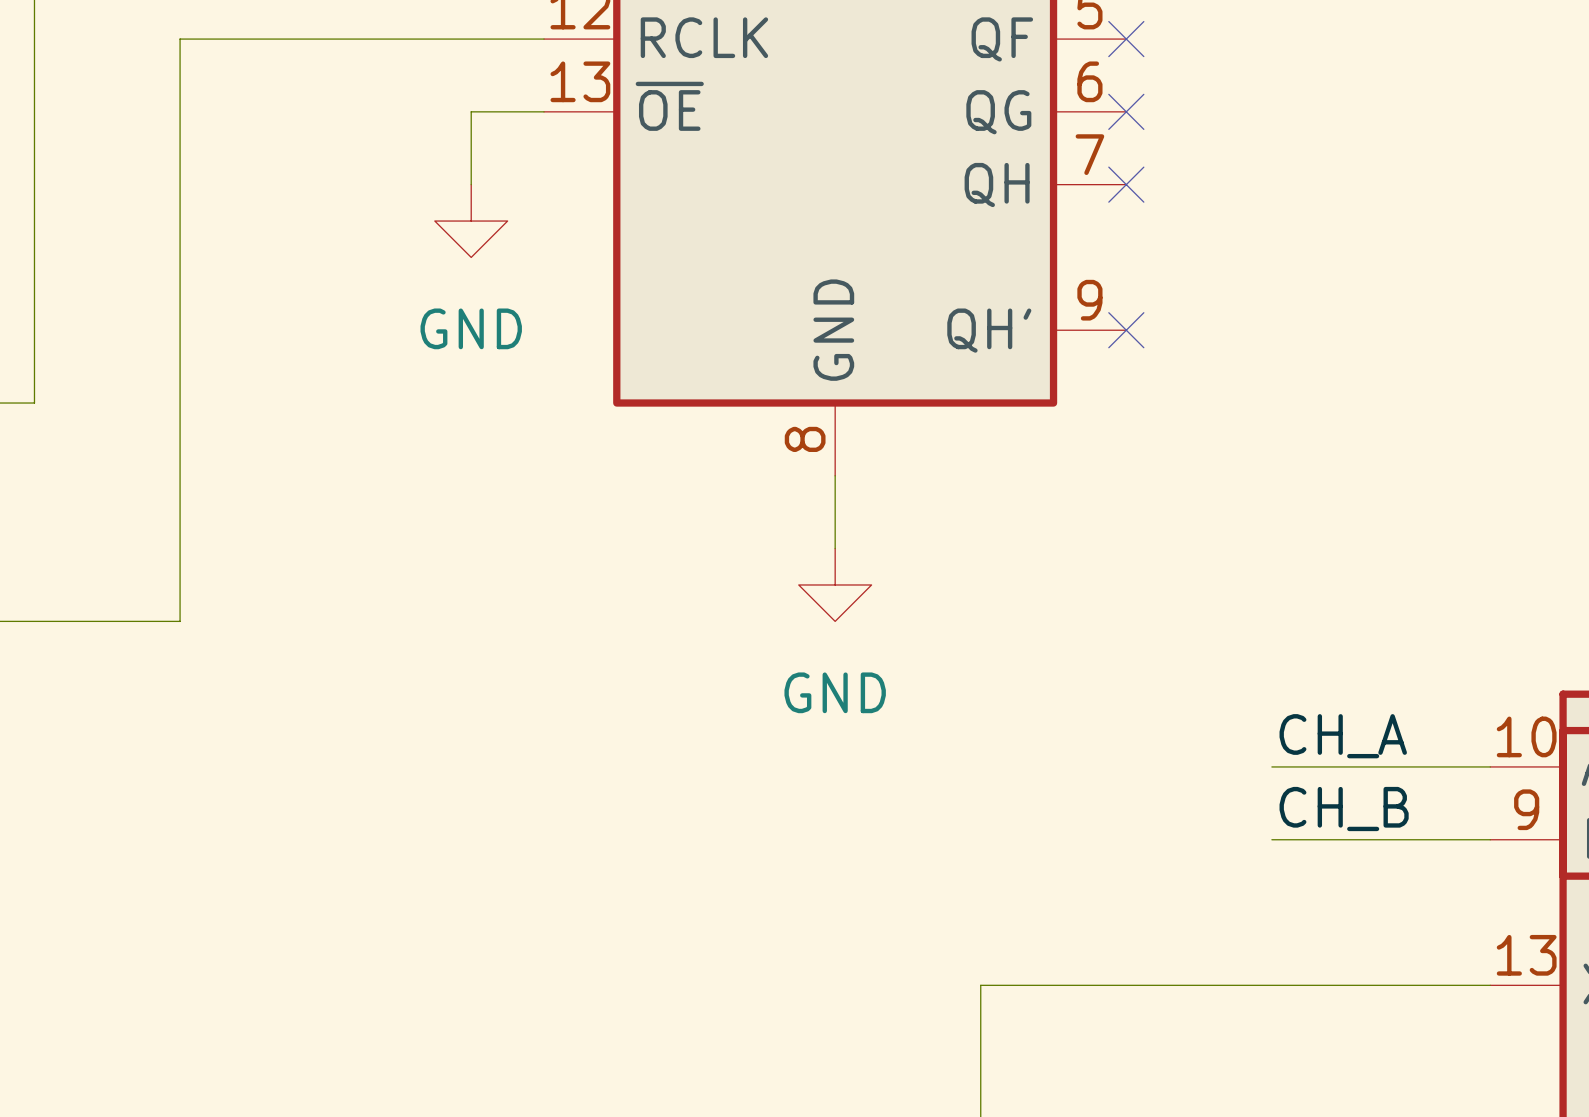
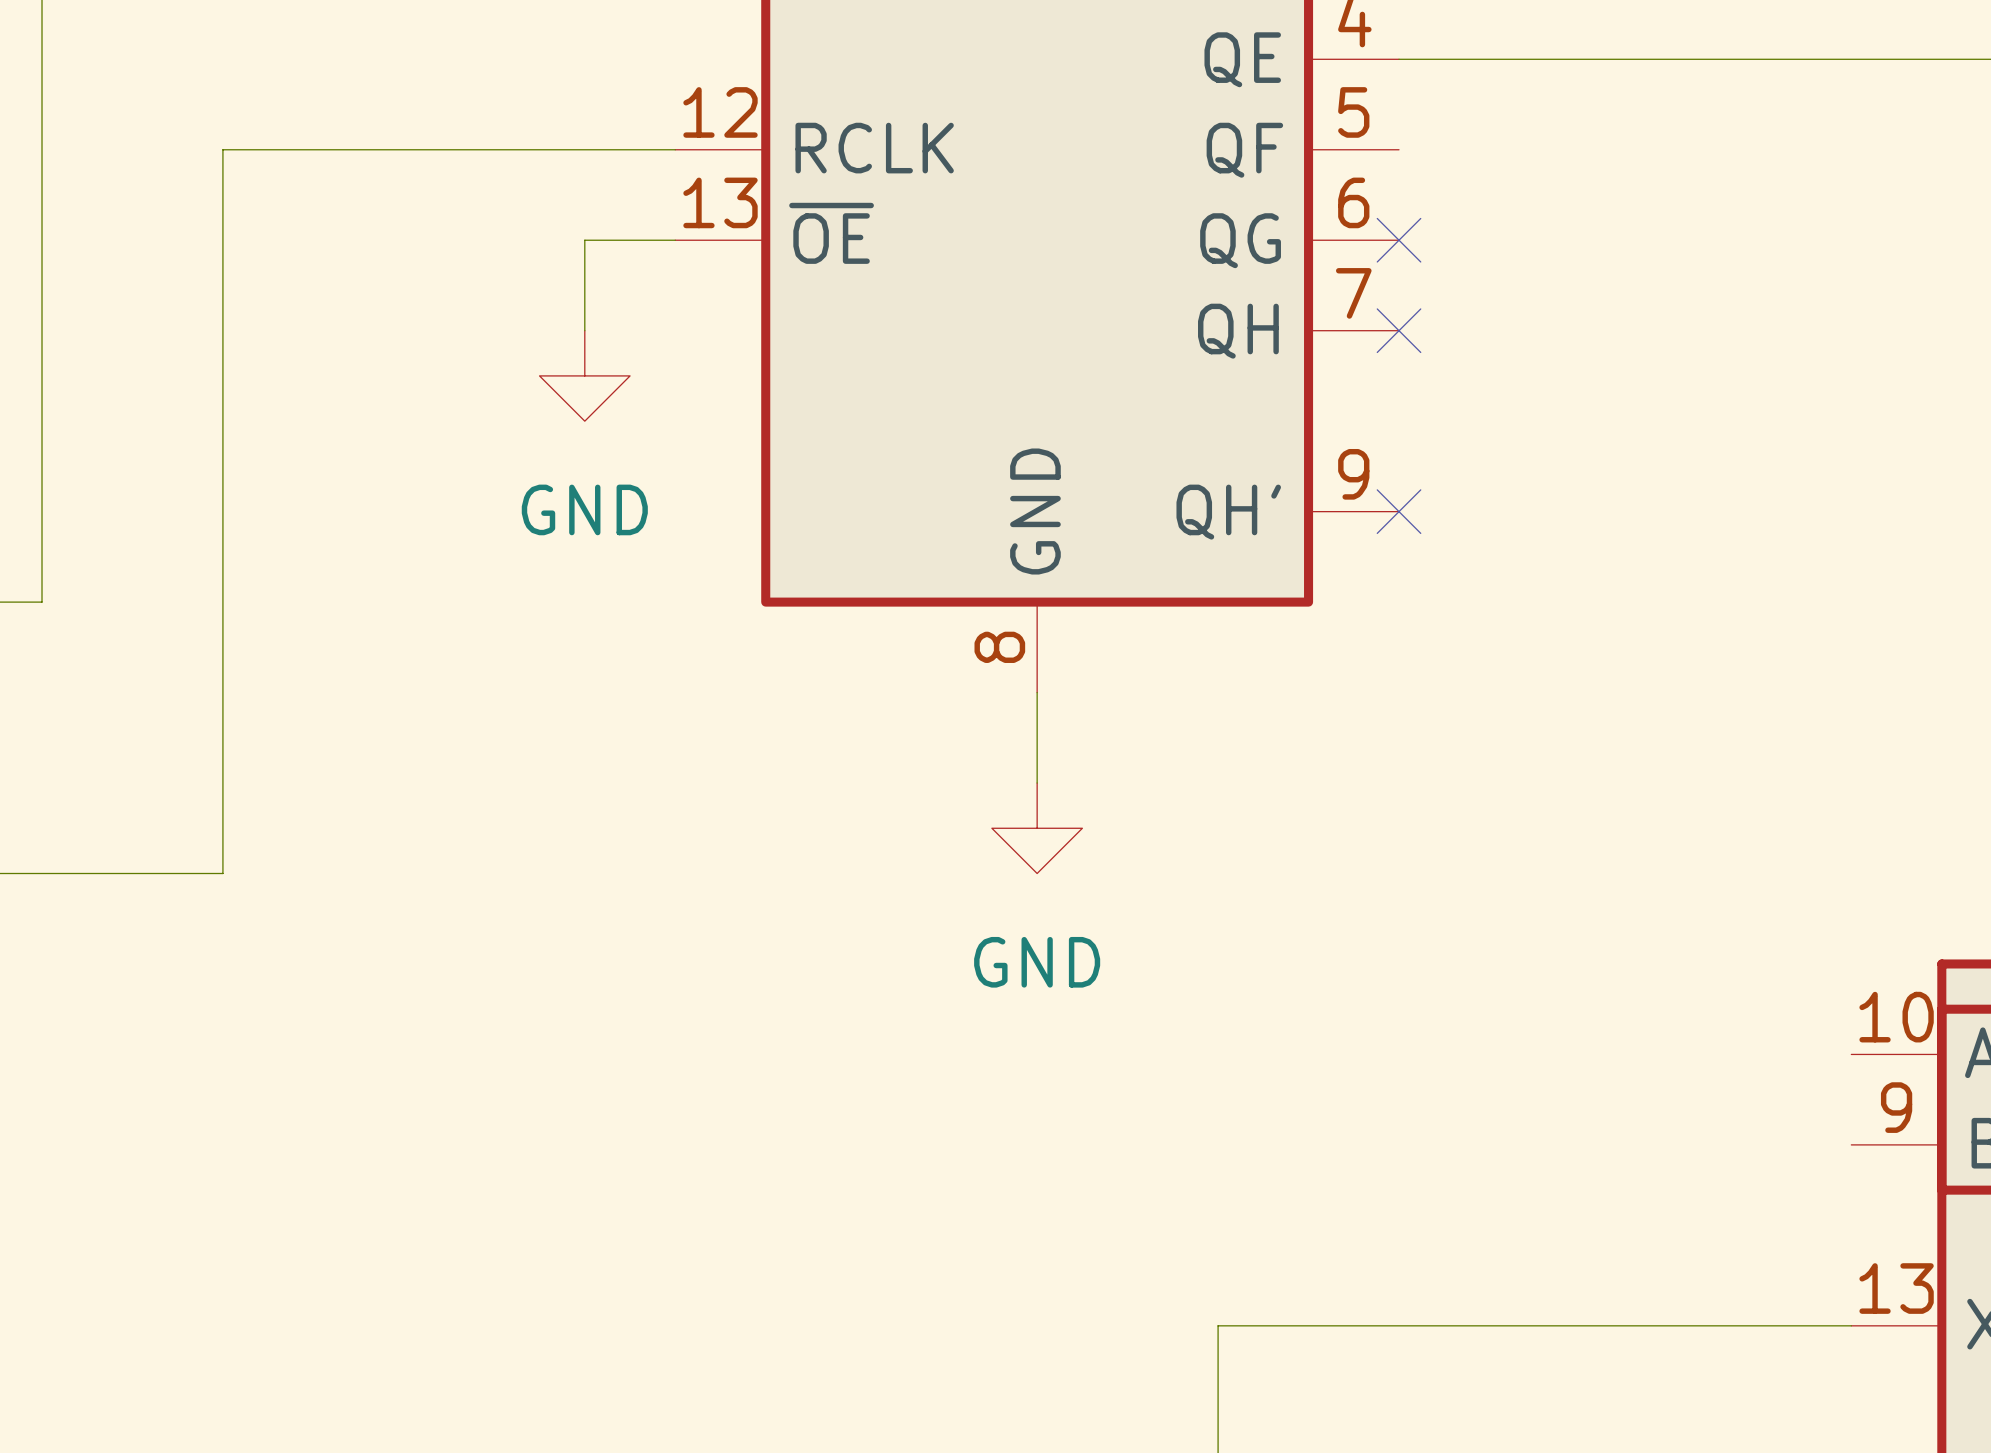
no-connect mark: (1126, 39) -> none
label: CH_A (1343, 736) -> none
wire: (1271, 766) (1490, 766) -> none
label: CH_B (1344, 809) -> none
wire: (1271, 839) (1490, 839) -> none

